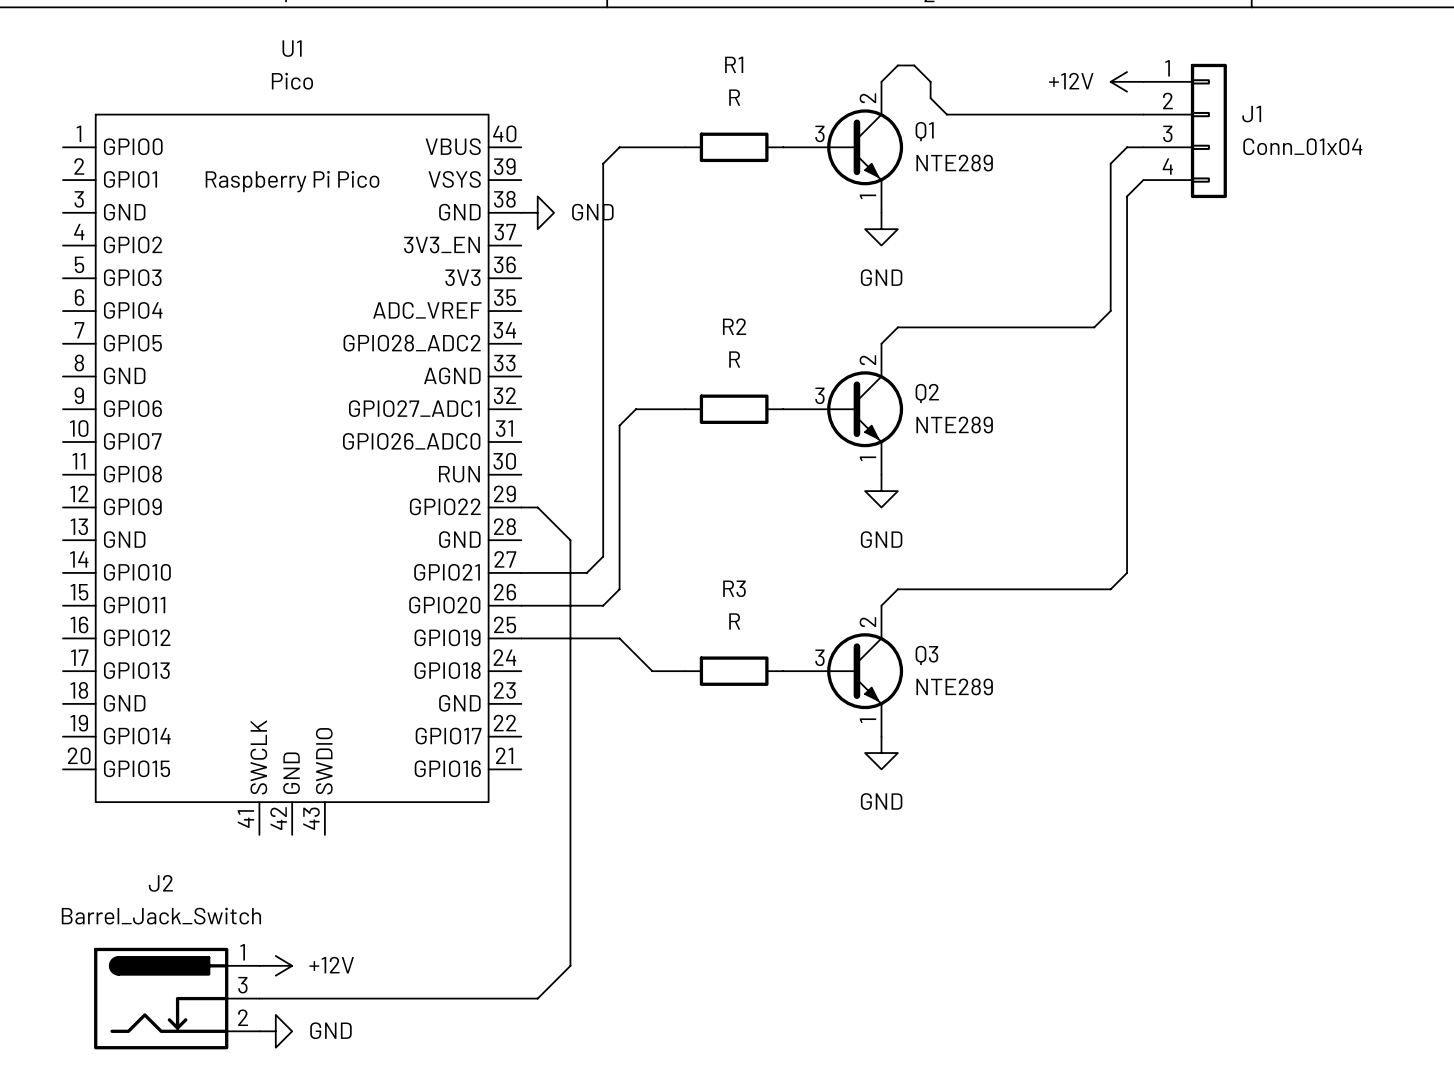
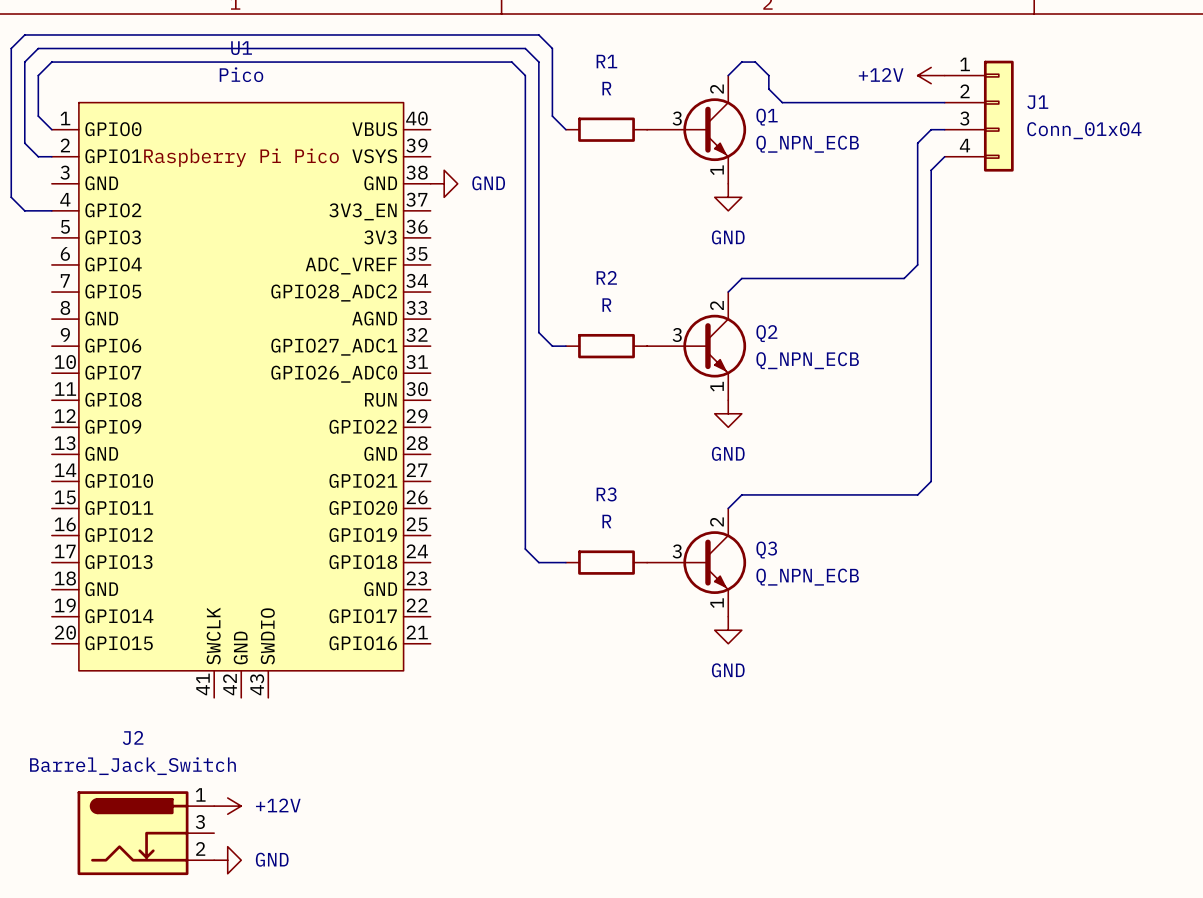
wire: (685, 147) (619, 147) (603, 163) (603, 556) (586, 572) (521, 572) -> (565, 129) (552, 116) (552, 48) (538, 34) (24, 34) (11, 48) (11, 197) (24, 210) (51, 210)
Q1 value: NTE289 (954, 163) -> Q_NPN_ECB (807, 144)
wire: (668, 409) (635, 409) (619, 425) (619, 589) (603, 605) (521, 605) -> (552, 346) (538, 332) (538, 62) (525, 48) (38, 48) (24, 62) (24, 143) (38, 156) (51, 156)
Q2 value: NTE289 (954, 424) -> Q_NPN_ECB (807, 360)
wire: (521, 507) (537, 507) (570, 540) (570, 965) (537, 998) (259, 998) -> none
wire: (521, 638) (619, 638) (635, 654) -> (51, 129) (38, 116) (38, 75) (51, 62) (511, 62) (525, 75) (525, 549)
Q3 value: NTE289 (954, 686) -> Q_NPN_ECB (807, 577)

